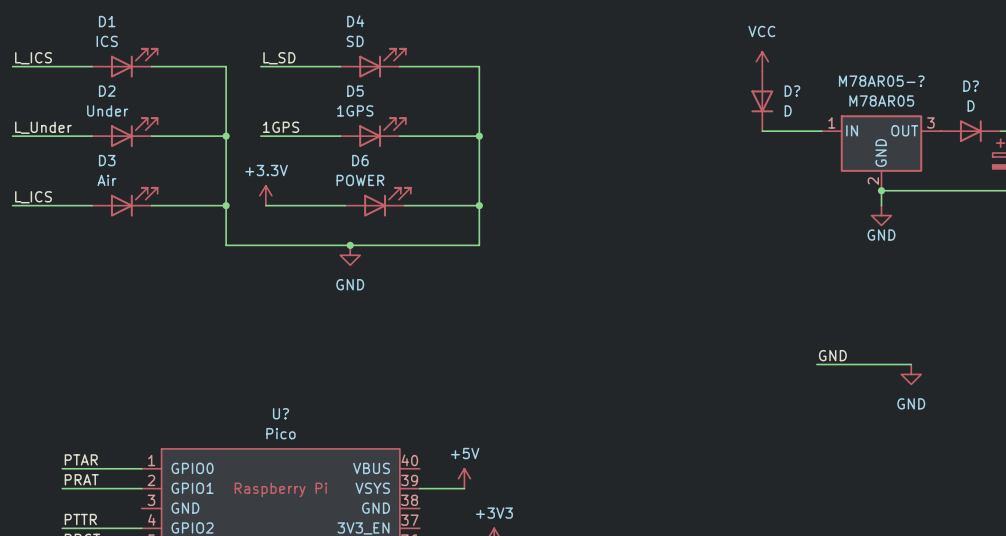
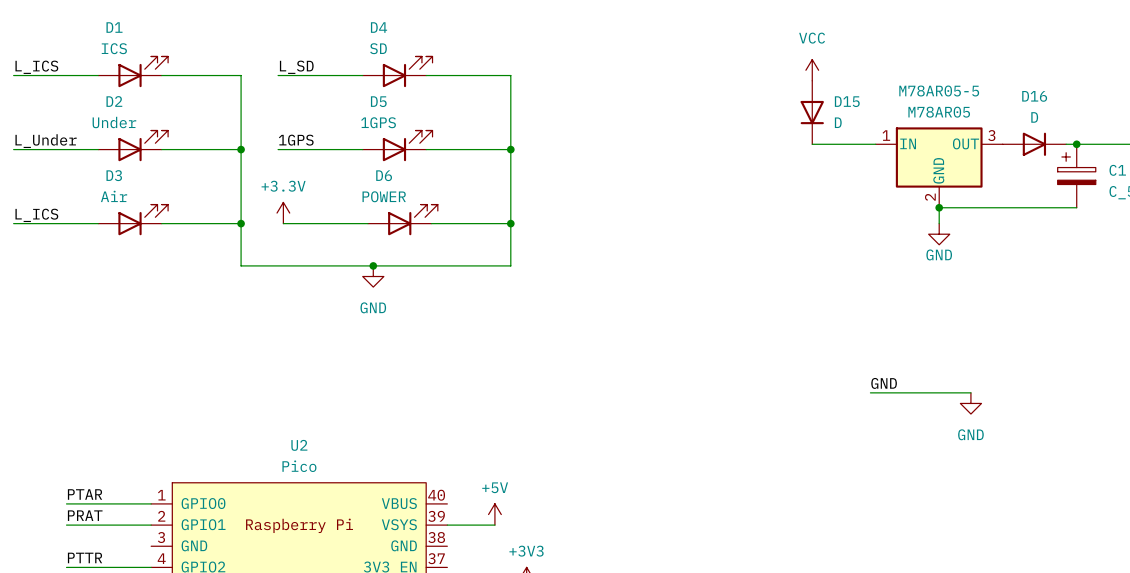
M78AR05-? name: M78AR05-? (881, 81) -> M78AR05-5 (939, 91)
D? name: D? (971, 86) -> D16 (1034, 96)
D? name: D? (792, 91) -> D15 (847, 101)
U? name: U? (280, 413) -> U2 (299, 445)

